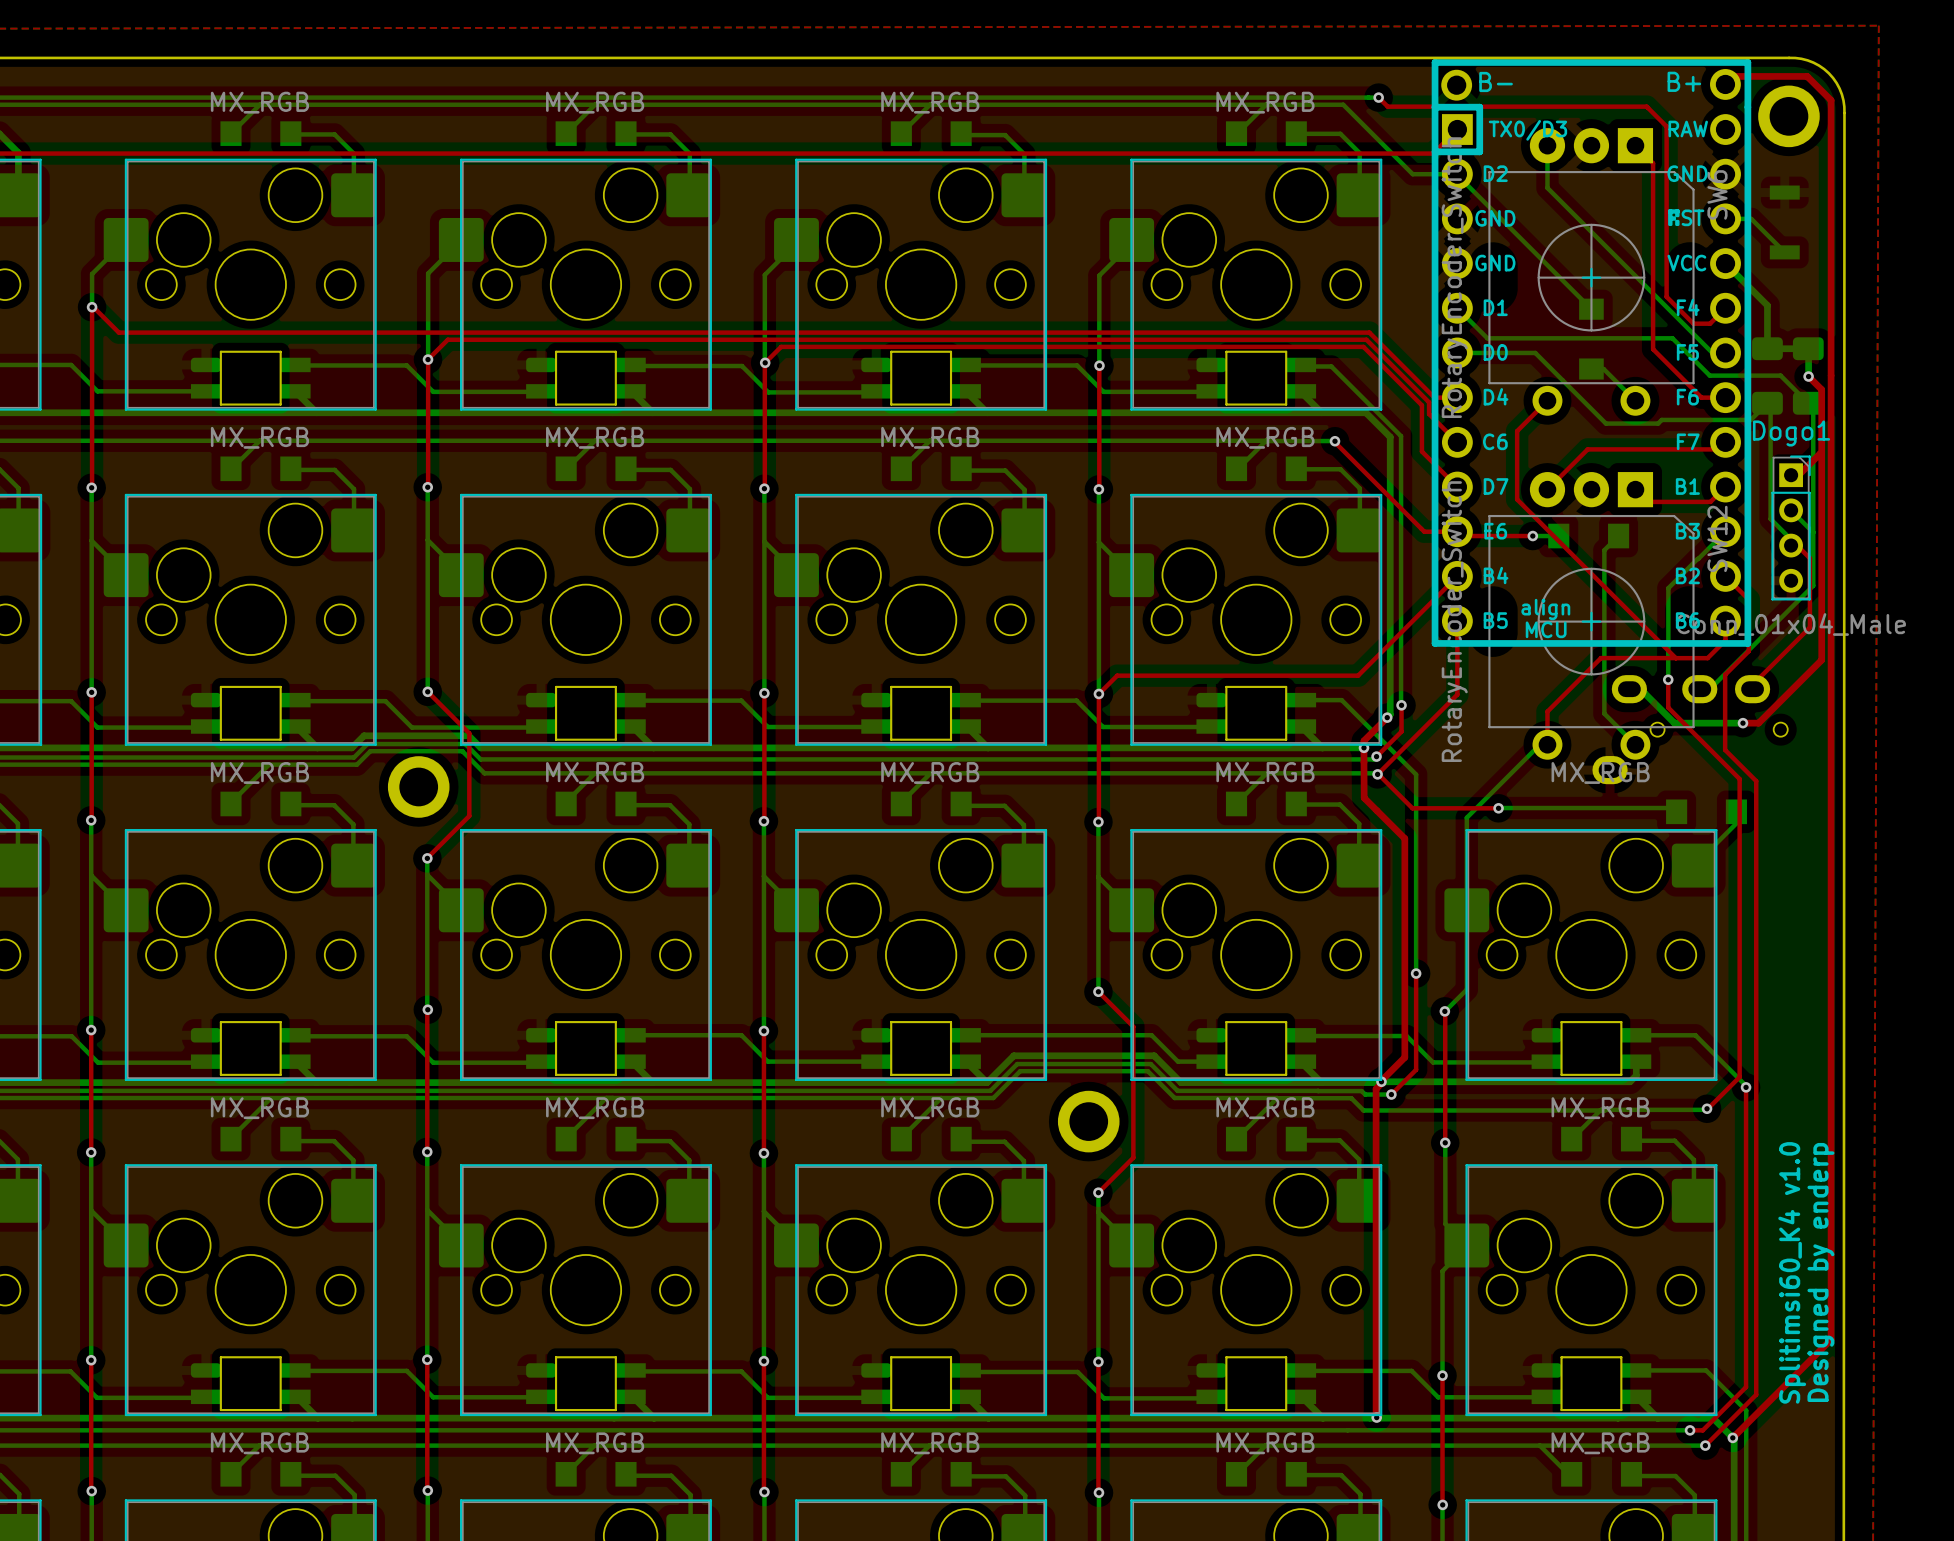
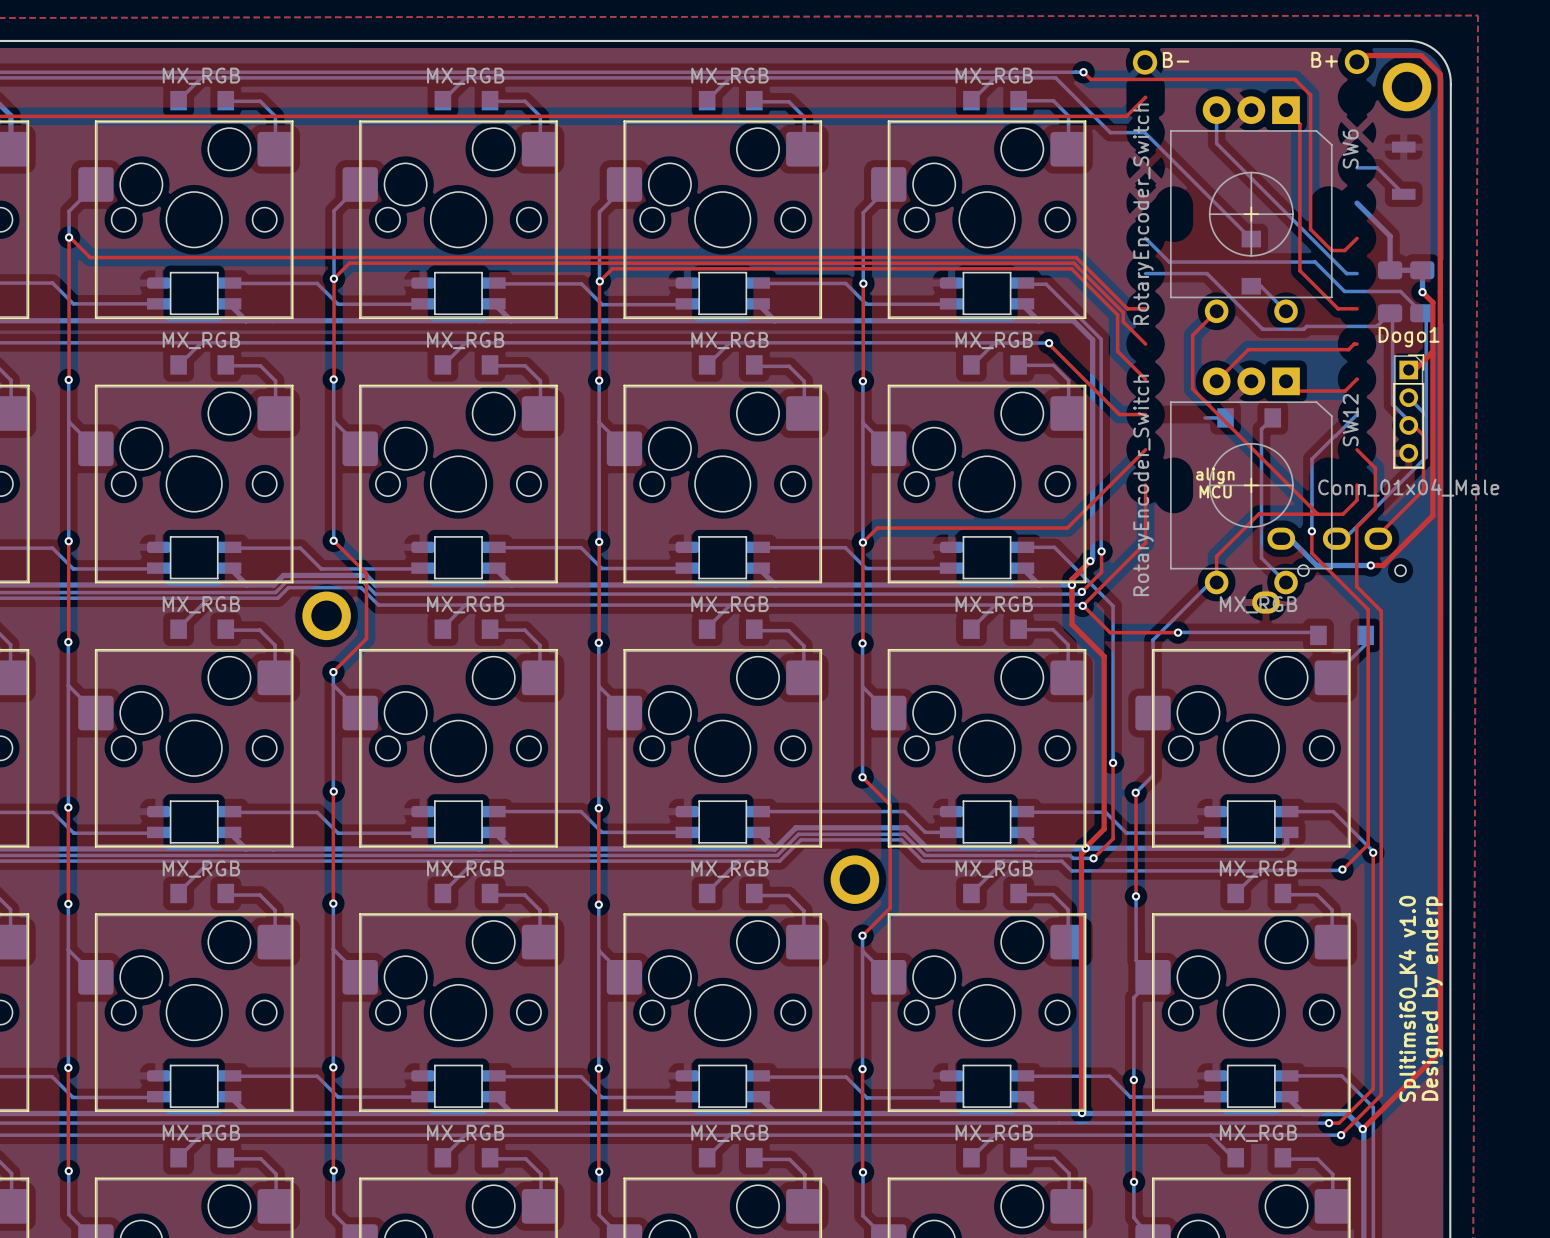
part: (1591, 352) -> none
top track: (1457, 531) (1461, 536) (1532, 536) -> none
via: (1532, 536) -> none

